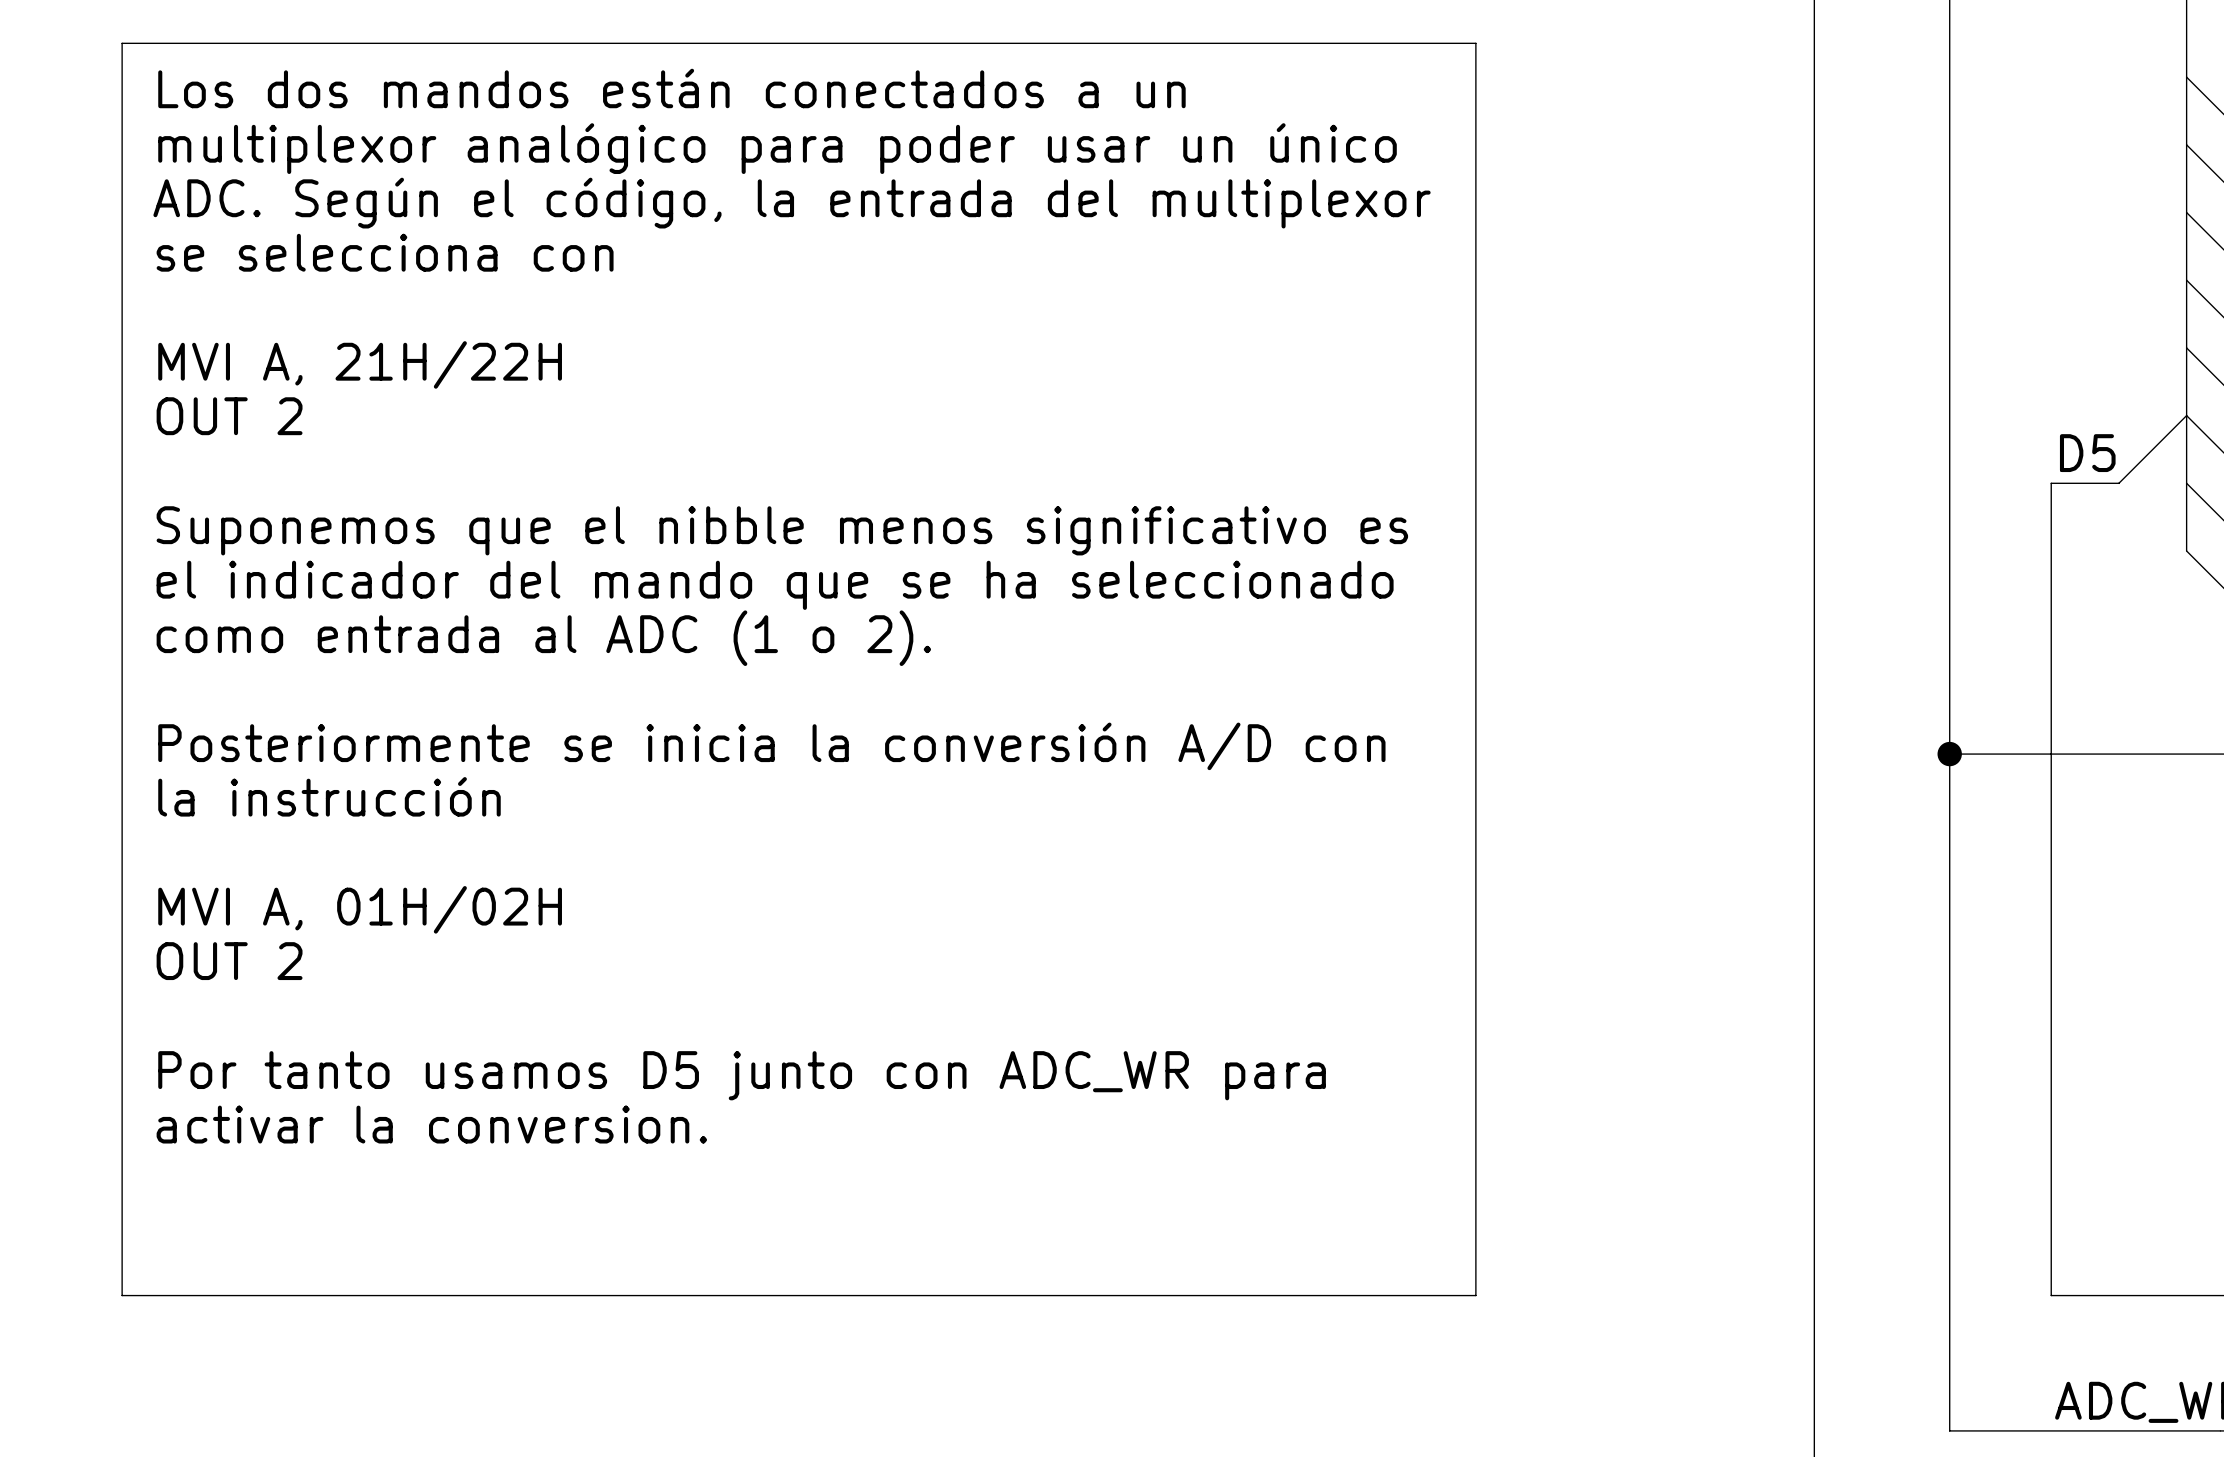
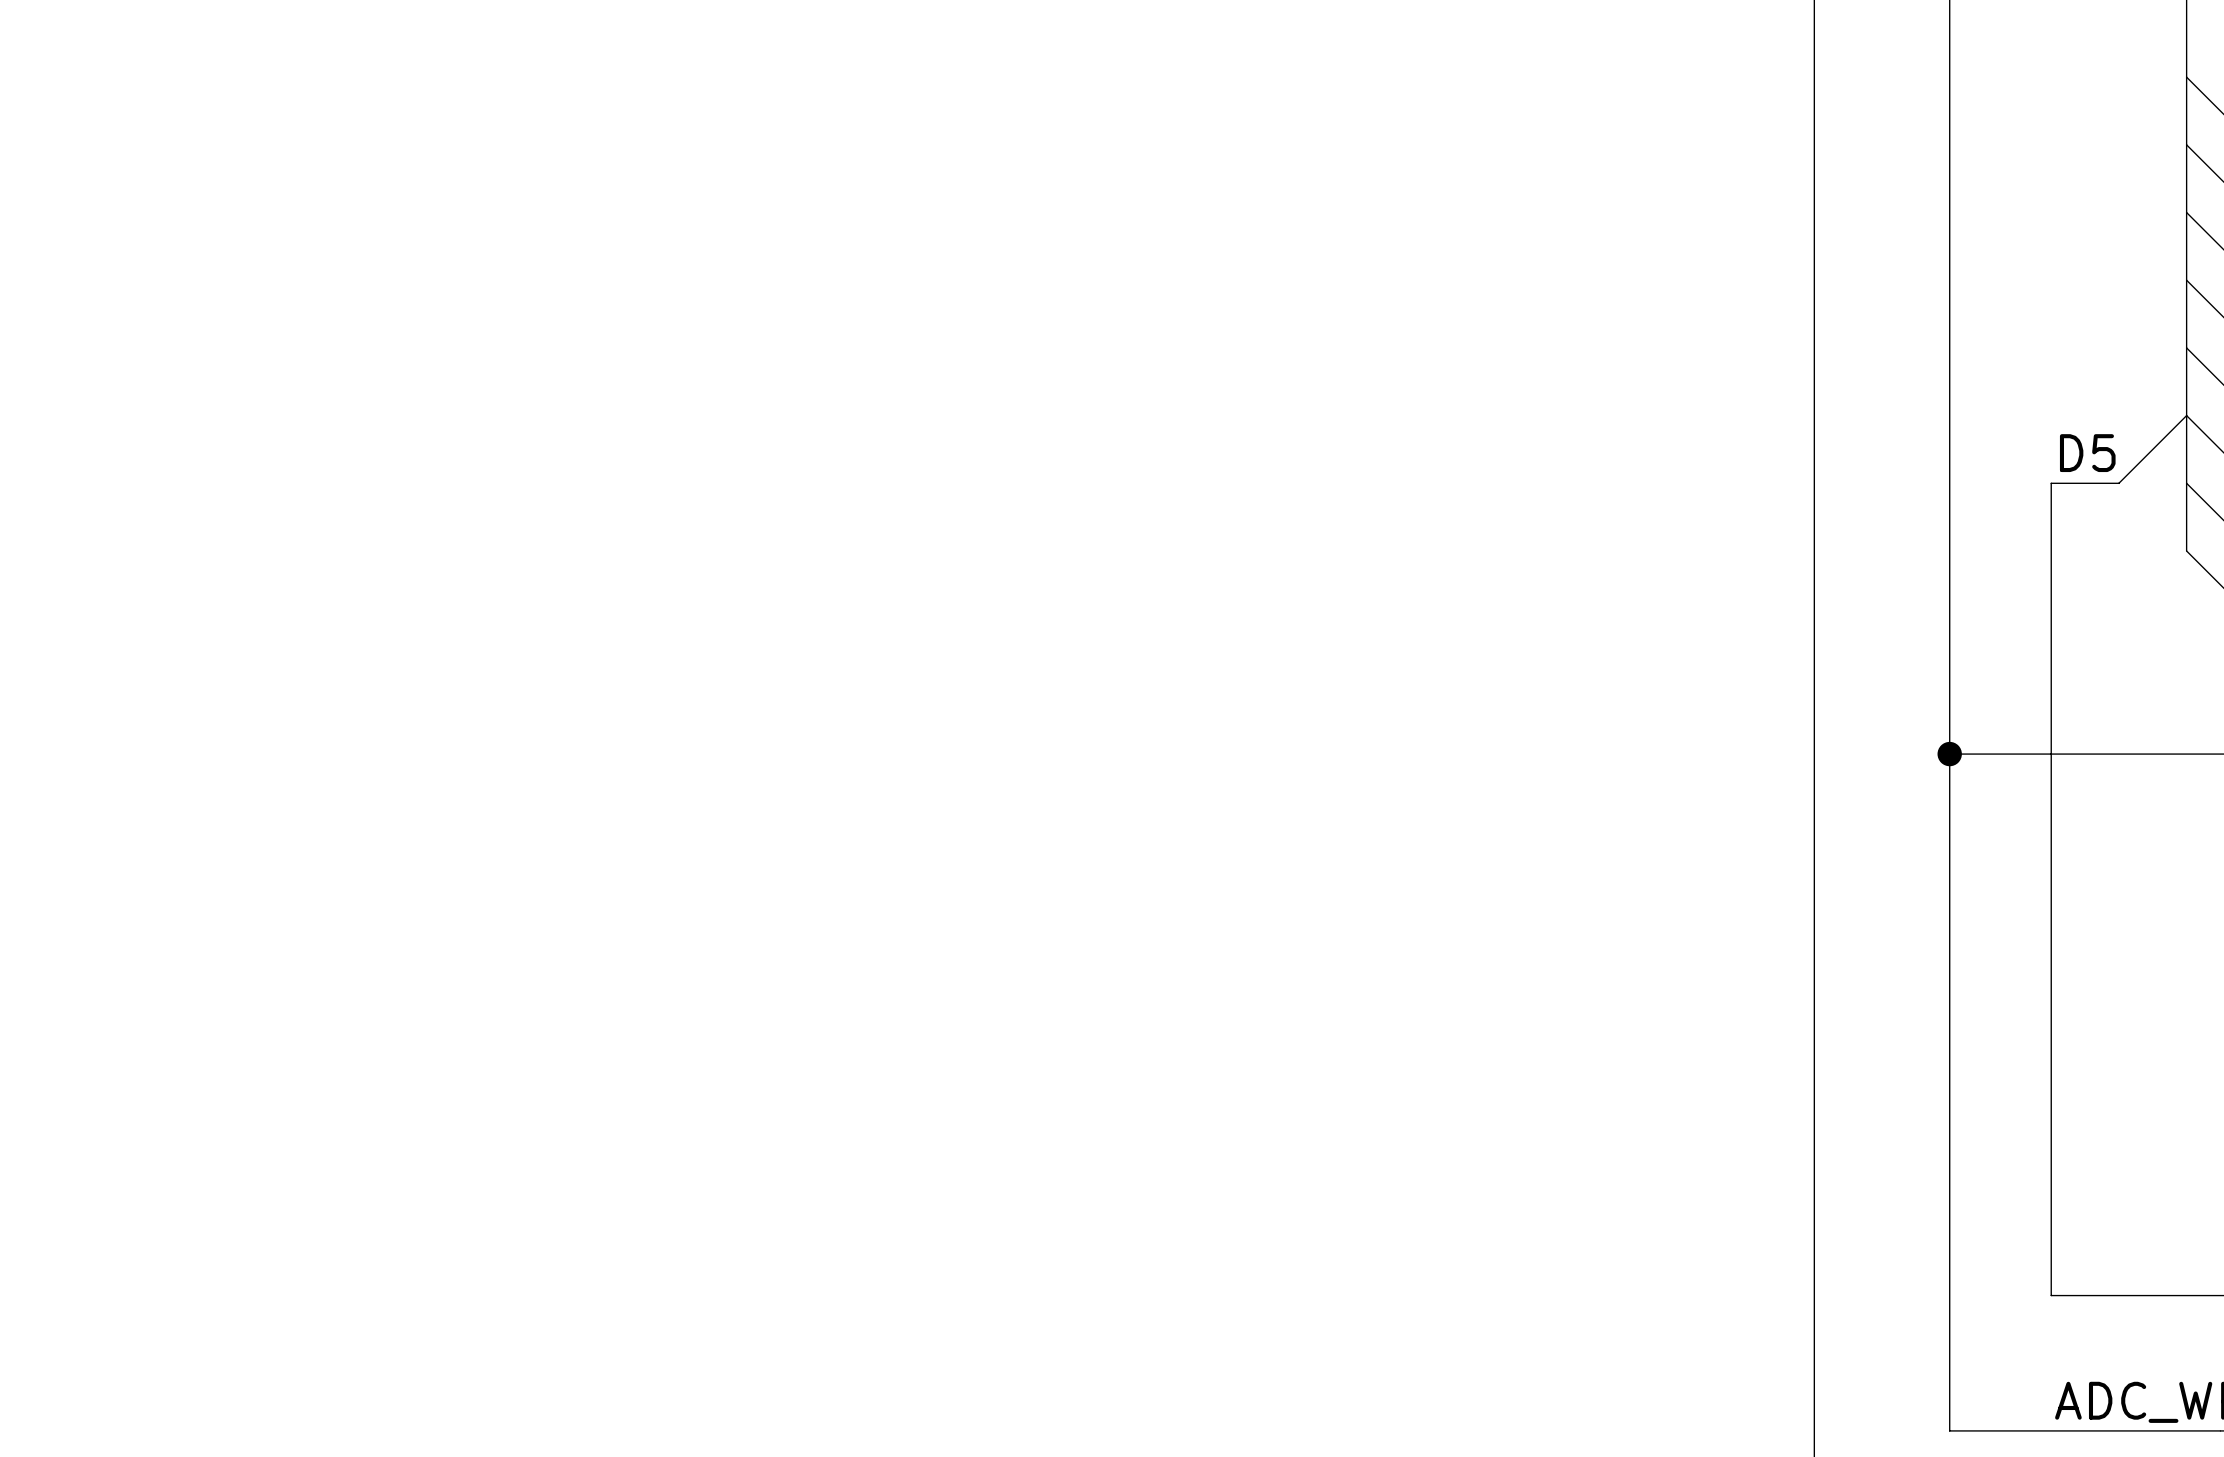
line: (122, 43) (1475, 43) (1475, 1295) (122, 1295) (122, 43) -> none
text: Los dos mandos están conectados a un (671, 88) -> none
text: multiplexor analógico para poder usar un único (777, 148) -> none
text: ADC. Según el código, la entrada del multiplexor (792, 203) -> none
text: se selecciona con (385, 252) -> none
text: MVI A, 21H/22H (360, 364) -> none
text: OUT 2 (229, 416) -> none
text: Suponemos que el nibble menos significativo es (782, 530) -> none
text: el indicador del mando que se ha seleccionado (775, 585) -> none
text: como entrada al ADC (1 o 2). (543, 638) -> none
text: Posteriormente se inicia la conversión A/D con (771, 746) -> none
text: la instrucción (329, 796) -> none
text: MVI A, 01H/02H (360, 909) -> none
text: OUT 2 (229, 961) -> none
text: Por tanto usamos D5 junto con ADC_WR para (742, 1075) -> none
text: activar la conversion. (431, 1124) -> none

